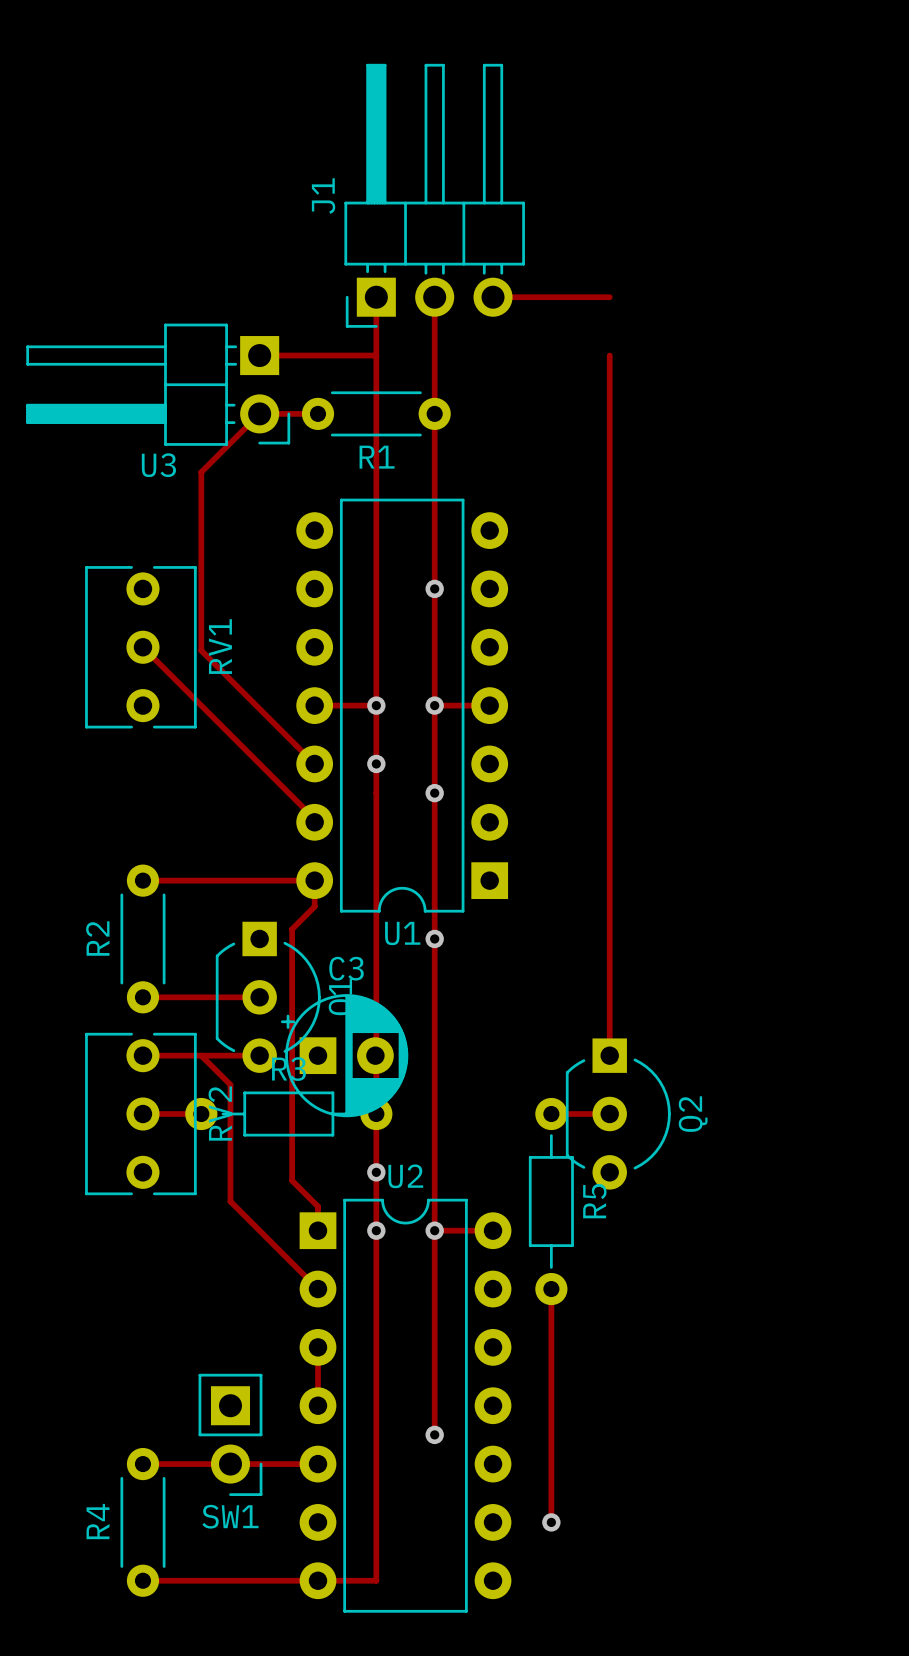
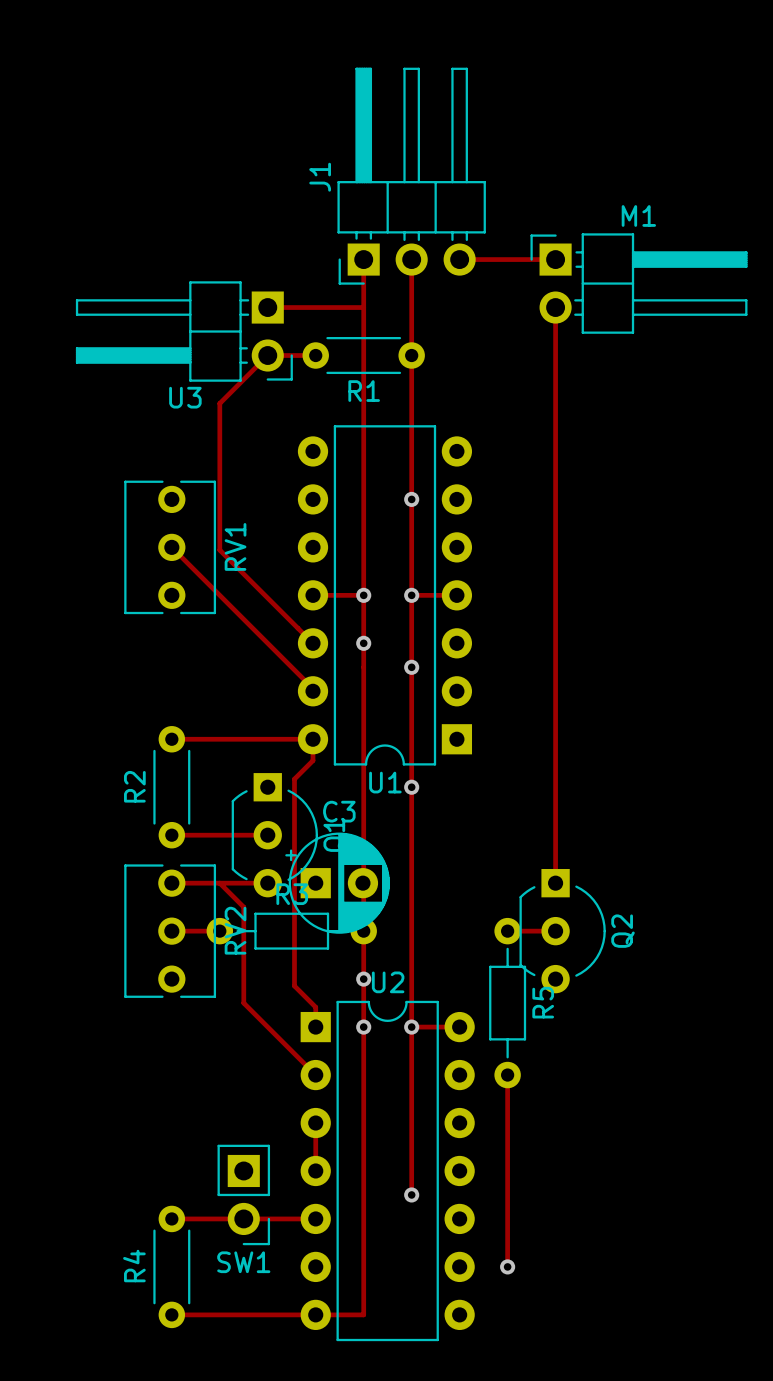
M1: none -> (638, 283)

